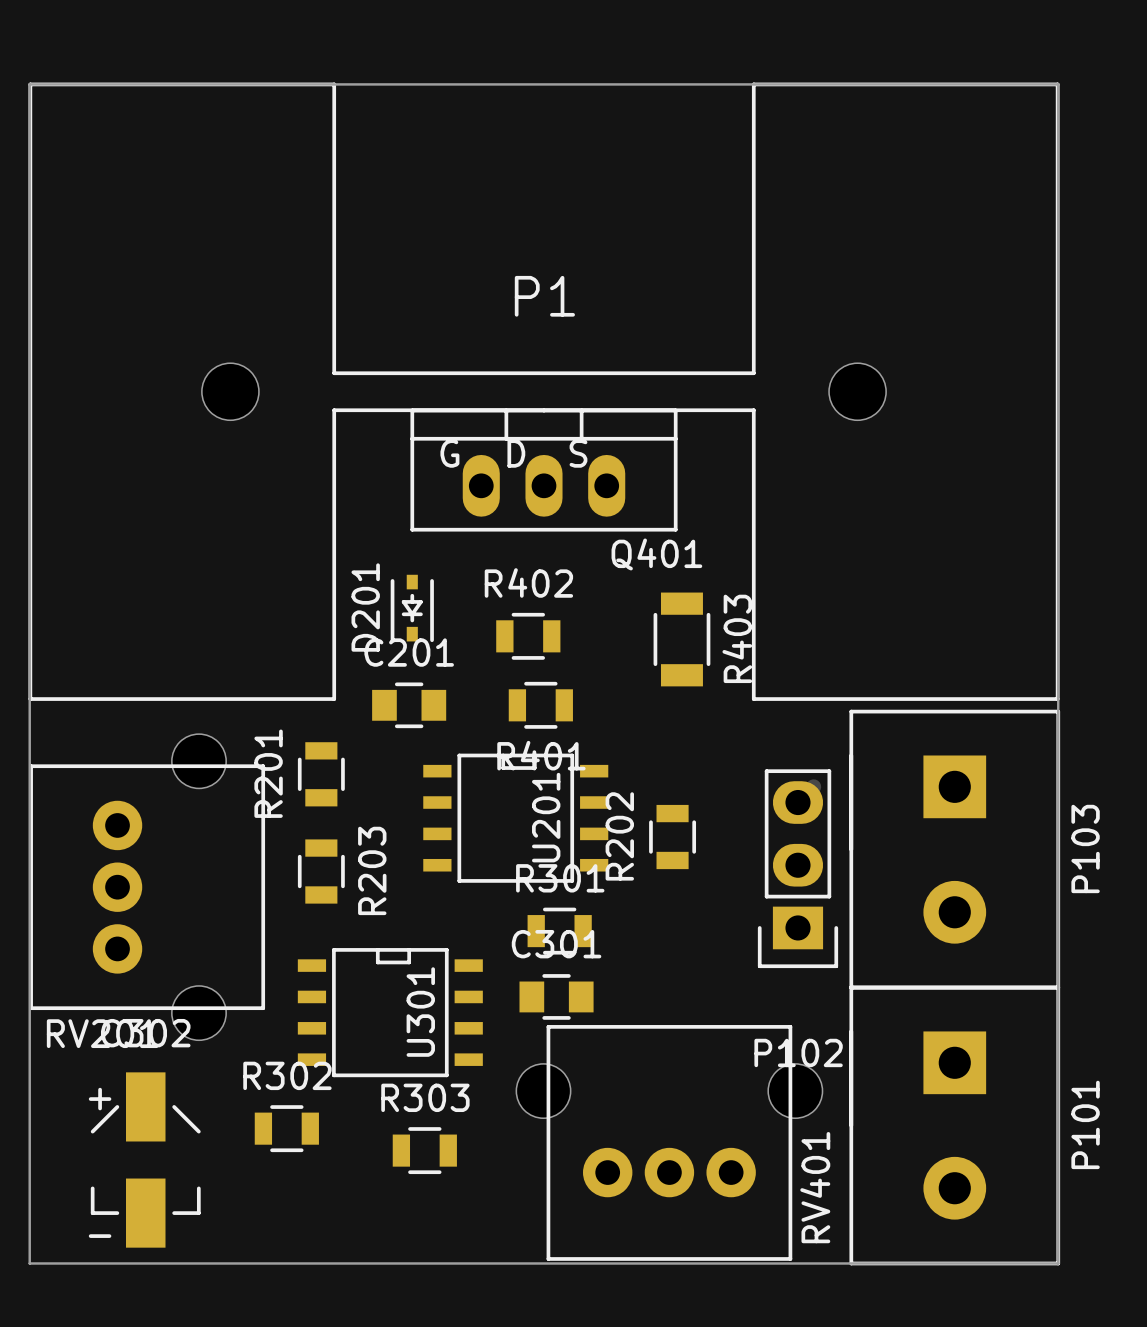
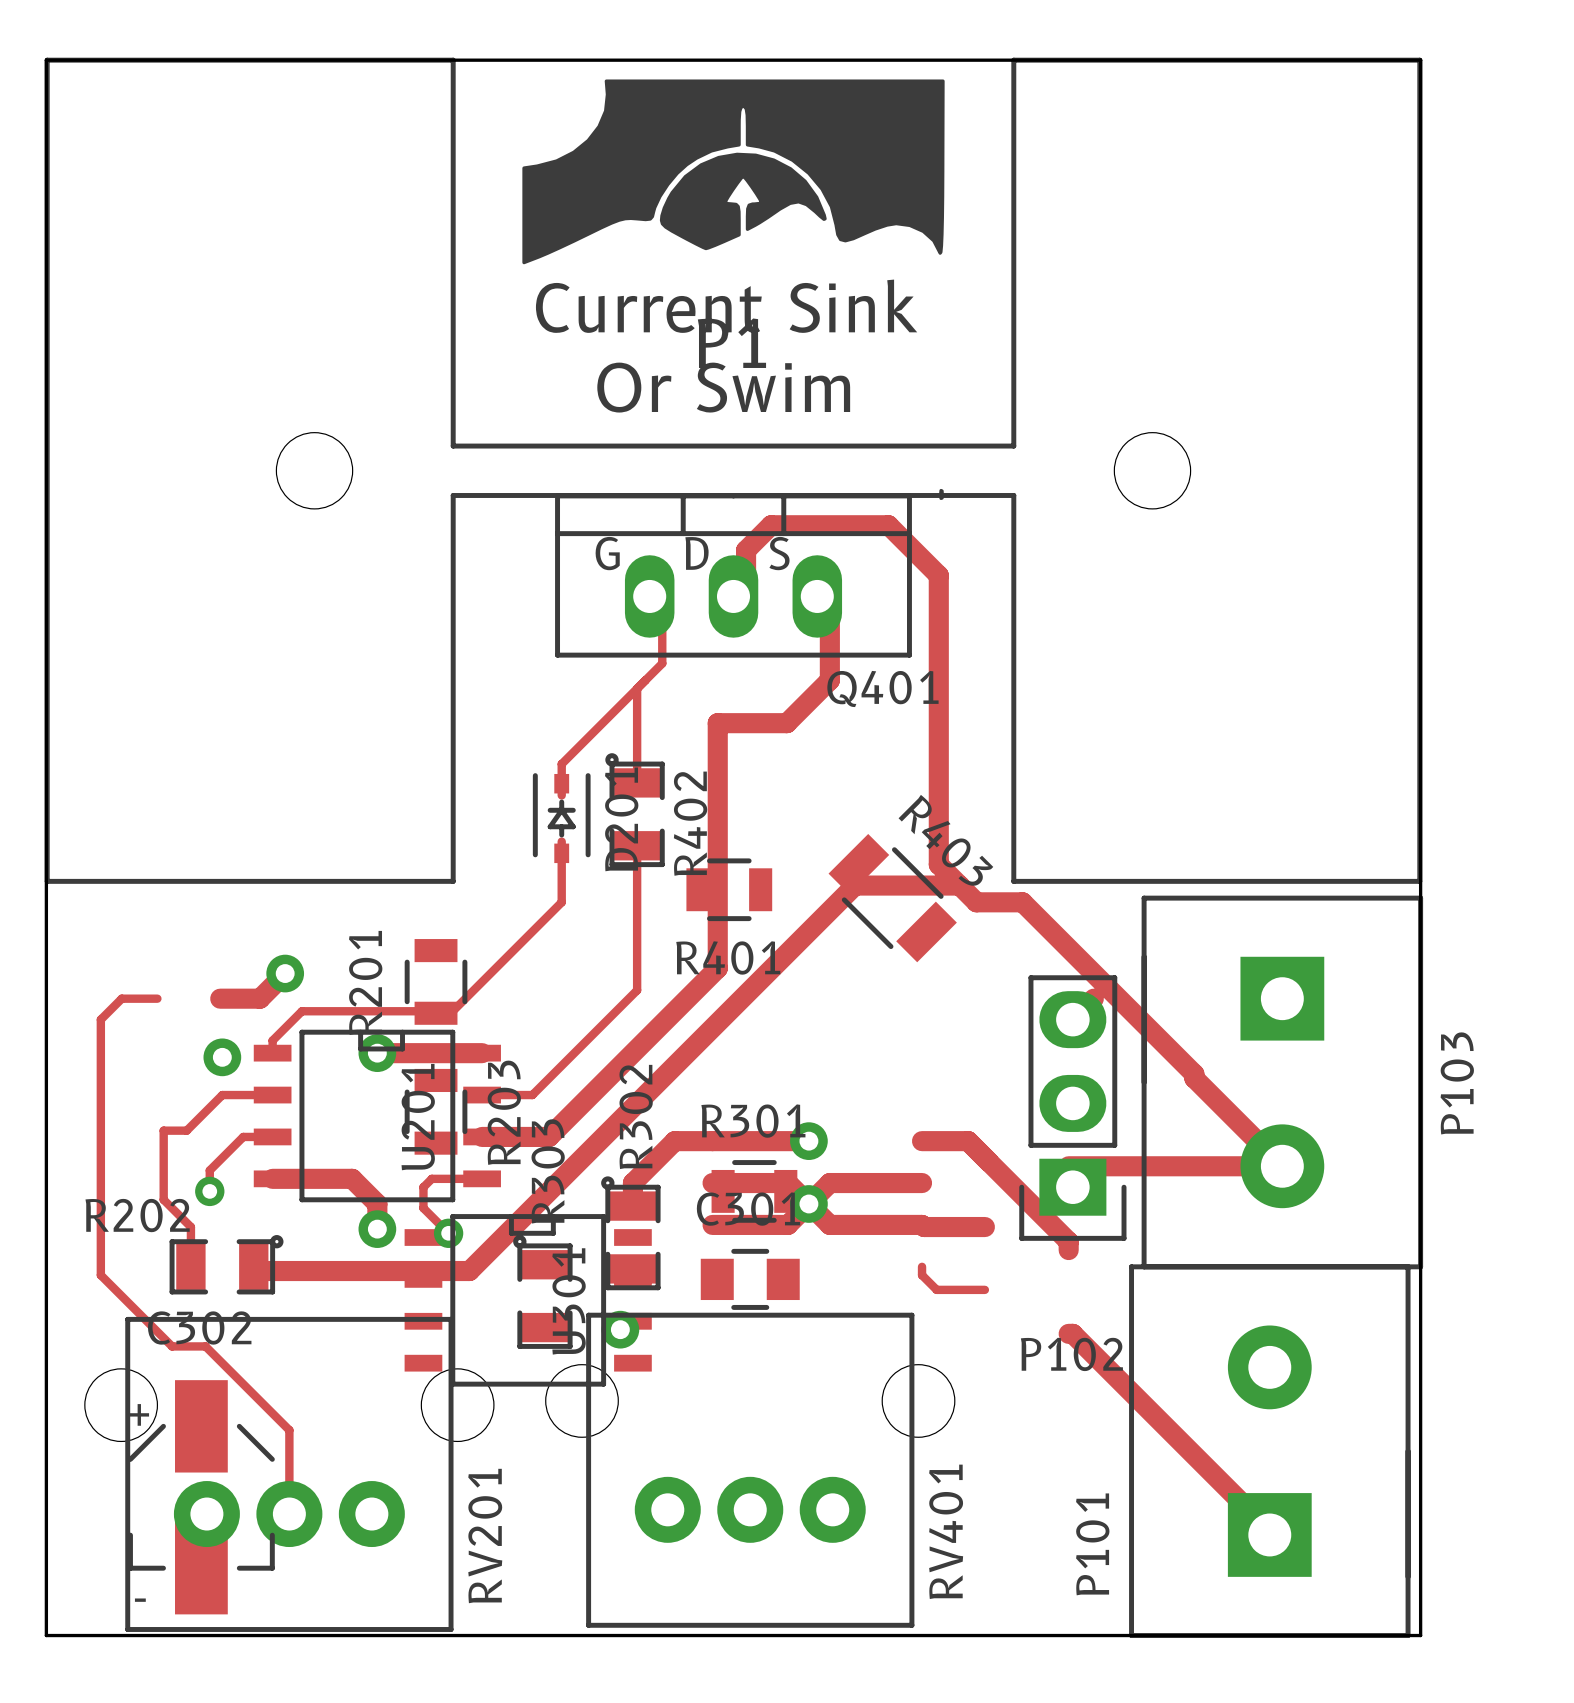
drawing: none -> [522, 79, 945, 501]
text: none -> Current Sink (726, 306)
text: none -> Or Swim (723, 387)
track: none -> (662, 600) (662, 663) (561, 764) (561, 795)
track: none -> (746, 600) (746, 550) (771, 525) (888, 525) (938, 575) (938, 864) (976, 902) (1022, 902) (1194, 1074) (1194, 1078) (1269, 1153) (1269, 1162) (1265, 1166) (1068, 1166)
track: none -> (829, 600) (829, 680) (786, 723) (717, 723) (717, 968) (549, 1136) (482, 1136)
track: none -> (637, 688) (637, 782)
R402 name position: R402 (528, 582) -> R402 (690, 823)
D201 rotation: 0° (412, 608) -> 180° (561, 818)
D201 position: (412, 608) -> (561, 818)
R402 footprint: [496, 612, 561, 660] -> [605, 753, 665, 868]
R403 rotation: 0° (681, 639) -> 45° counterclockwise (892, 898)
R403 position: (681, 639) -> (892, 898)
track: none -> (561, 841) (561, 902) (452, 1011) (301, 1011) (272, 1040) (272, 1053)
track: none -> (637, 845) (637, 990) (532, 1095) (482, 1095)
track: none -> (959, 885) (855, 885) (469, 1271) (257, 1271) (253, 1266)
C201: (409, 705) -> none
track: none -> (285, 973) (260, 998) (220, 998)
via: none -> (285, 973)
track: none -> (157, 998) (121, 998) (100, 1019) (100, 1275) (172, 1346) (205, 1346) (289, 1430) (289, 1514)
R202 footprint: [649, 804, 697, 870] -> [169, 1235, 284, 1295]
U201 position: (515, 818) -> (377, 1116)
track: none -> (377, 1053) (482, 1053)
via: none -> (377, 1053)
via: none -> (222, 1057)
track: none -> (270, 1097) (272, 1095) (222, 1095) (186, 1130) (163, 1130) (163, 1199) (190, 1227) (190, 1266)
RV201 rotation: 0° (147, 887) -> 90° counterclockwise (289, 1474)
RV201 position: (147, 887) -> (289, 1474)
track: none -> (272, 1136) (243, 1136) (209, 1170) (209, 1191)
track: none -> (808, 1141) (674, 1141) (632, 1183) (632, 1206)
via: none -> (808, 1141)
track: none -> (922, 1141) (968, 1141) (1068, 1241) (1068, 1250)
track: none -> (272, 1178) (352, 1178) (377, 1203) (377, 1229)
track: none -> (482, 1178) (431, 1178) (423, 1187) (423, 1208) (448, 1233)
track: none -> (712, 1183) (787, 1183) (829, 1224) (984, 1227)
track: none -> (922, 1183) (829, 1183) (787, 1224) (712, 1224)
via: none -> (209, 1191)
via: none -> (808, 1203)
via: none -> (377, 1229)
via: none -> (448, 1233)
track: none -> (922, 1266) (922, 1275) (936, 1289) (984, 1289)
via: none -> (620, 1329)
track: none -> (1068, 1333) (1072, 1333) (1269, 1530) (1269, 1534)
R302 footprint: [254, 1105, 319, 1153] -> [601, 1176, 661, 1291]
P101 name position: P101 (1085, 1124) -> P101 (1092, 1544)
P101 rotation: 0° (954, 1125) -> 180° (1269, 1451)
R303 footprint: [392, 1127, 457, 1175] -> [513, 1235, 573, 1349]
RV401 position: (669, 1142) -> (750, 1470)

